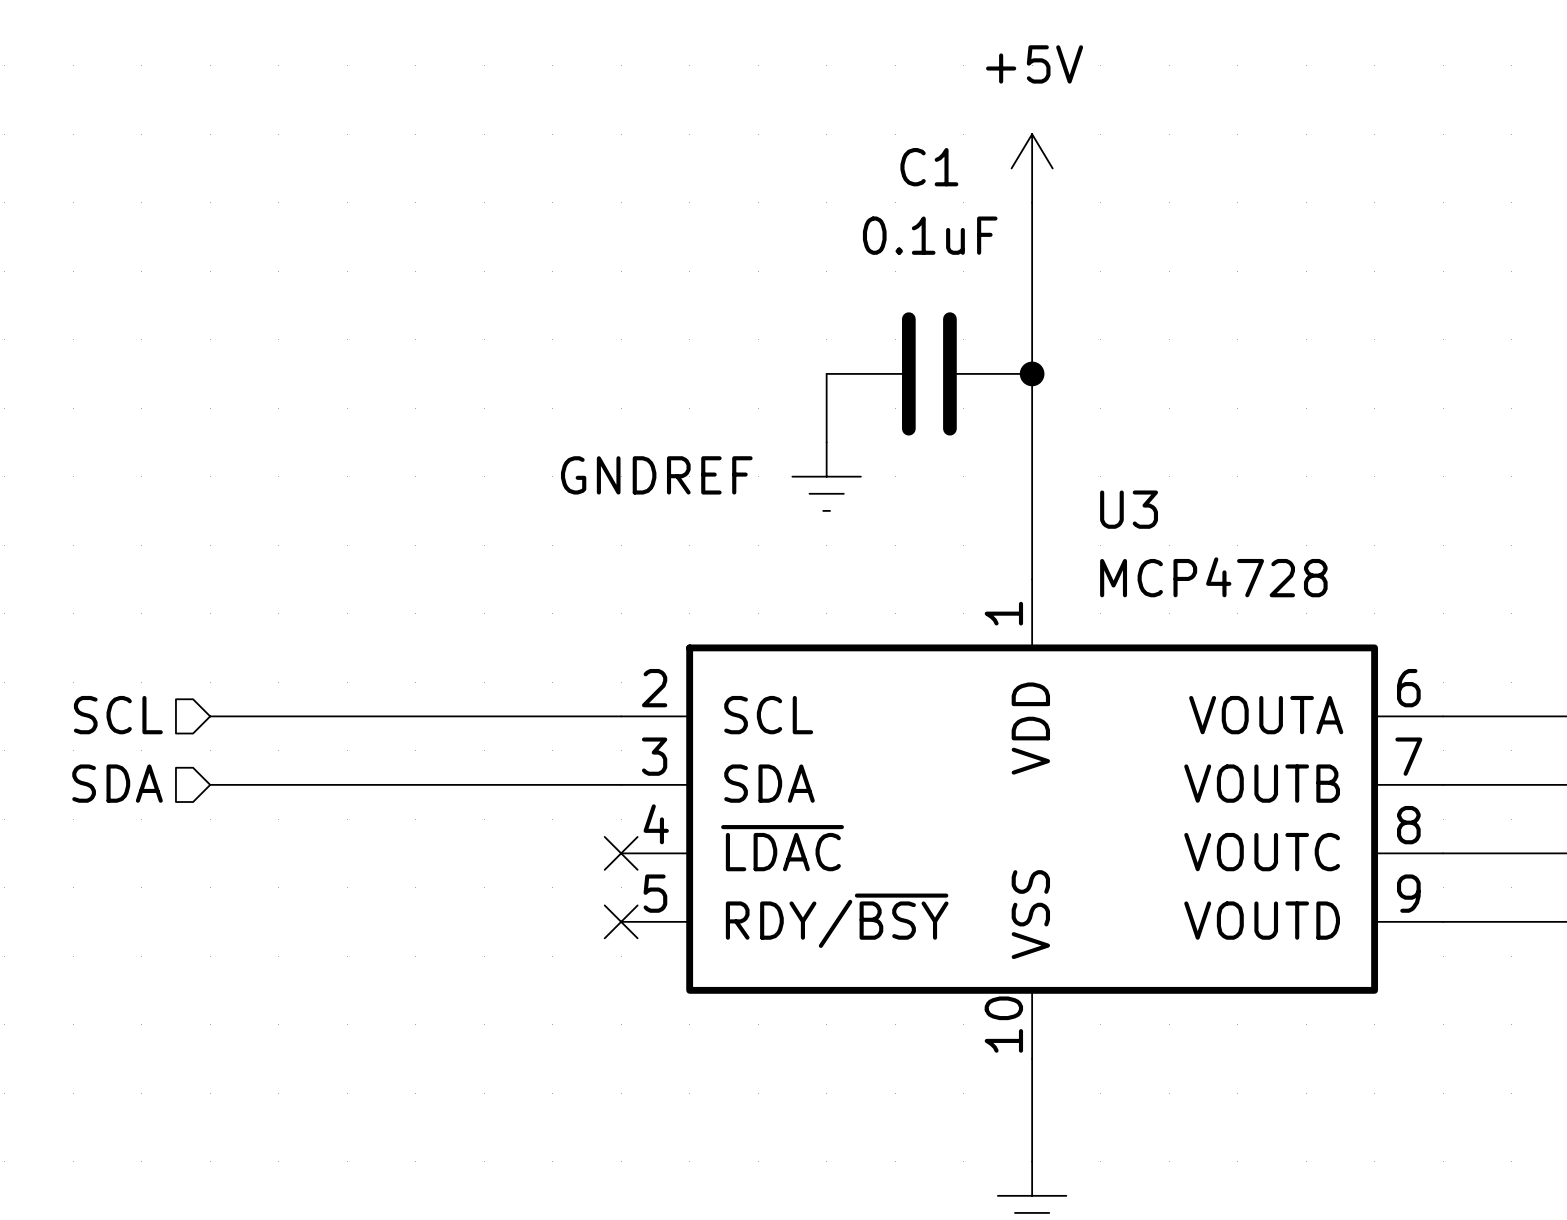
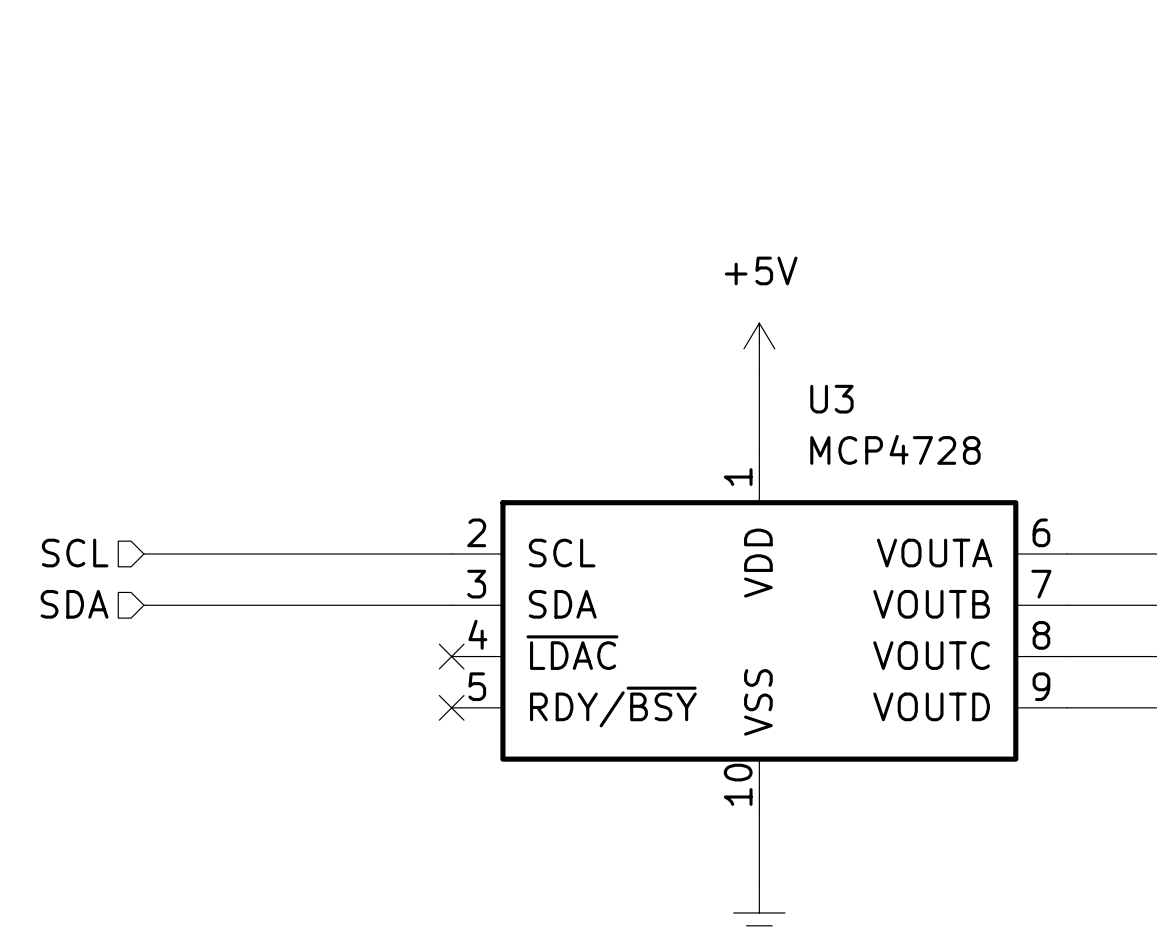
power symbol position: +5V (1032, 168) -> +5V (759, 348)
wire: (1032, 202) (1032, 476) -> none
wire: (826, 373) (826, 442) -> none
C1: 0.1uF (929, 373) -> none
junction: (1032, 373) -> none
power symbol: GNDREF (826, 476) -> none

